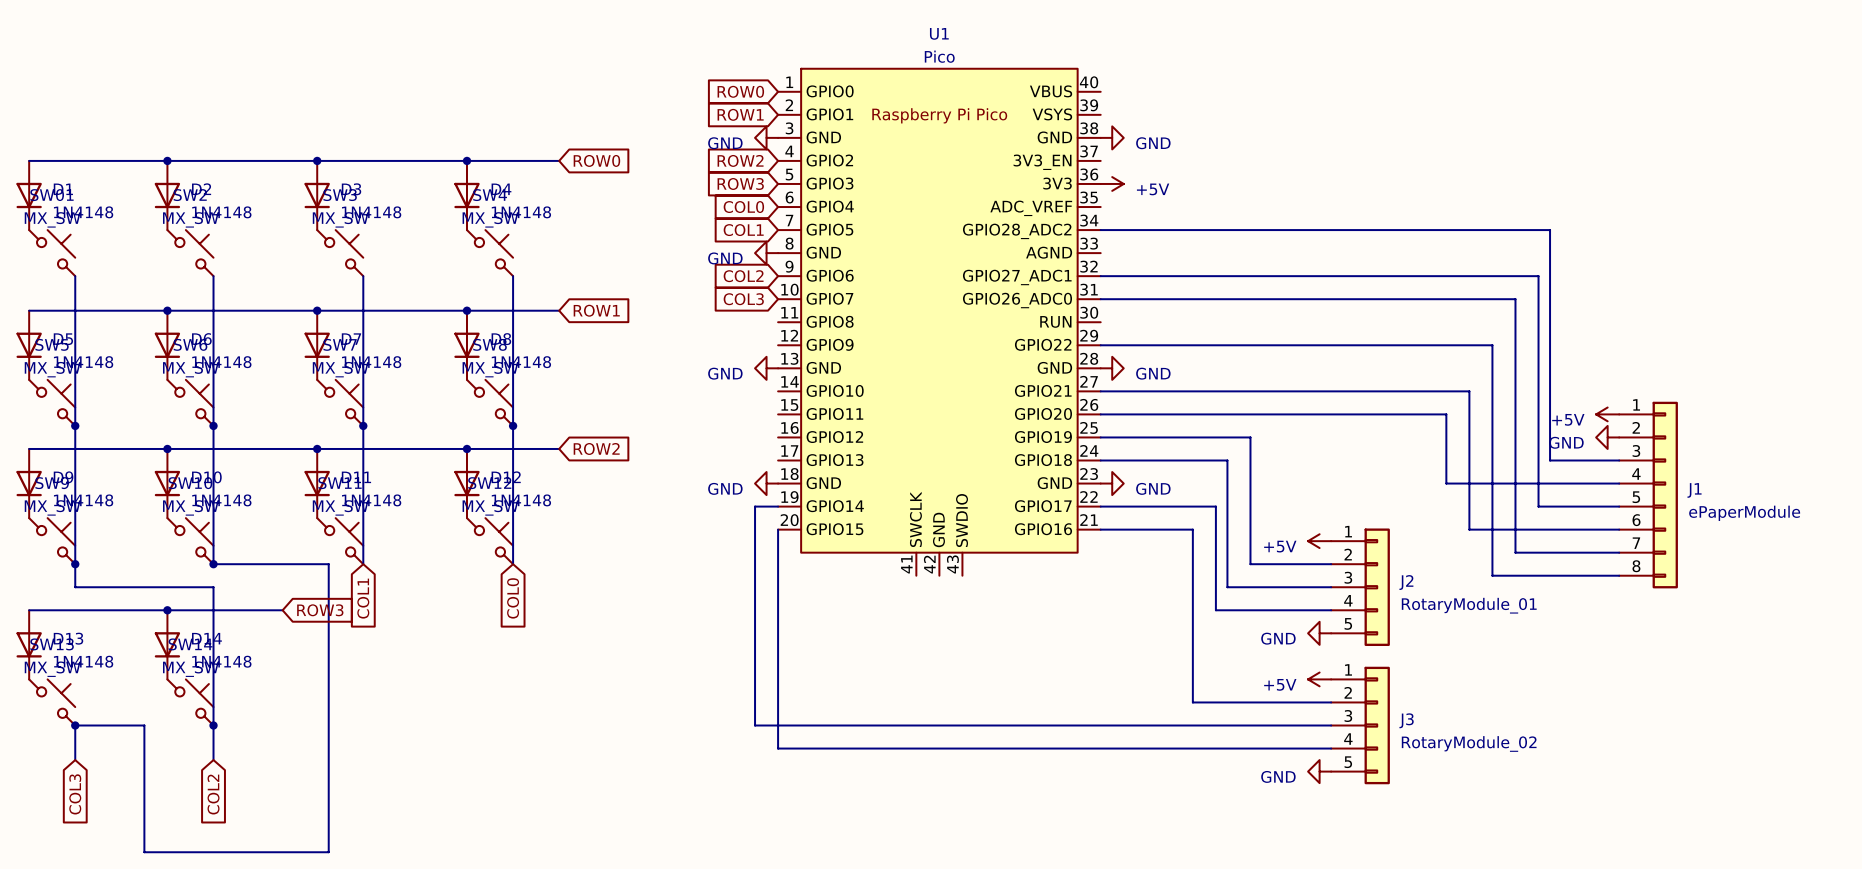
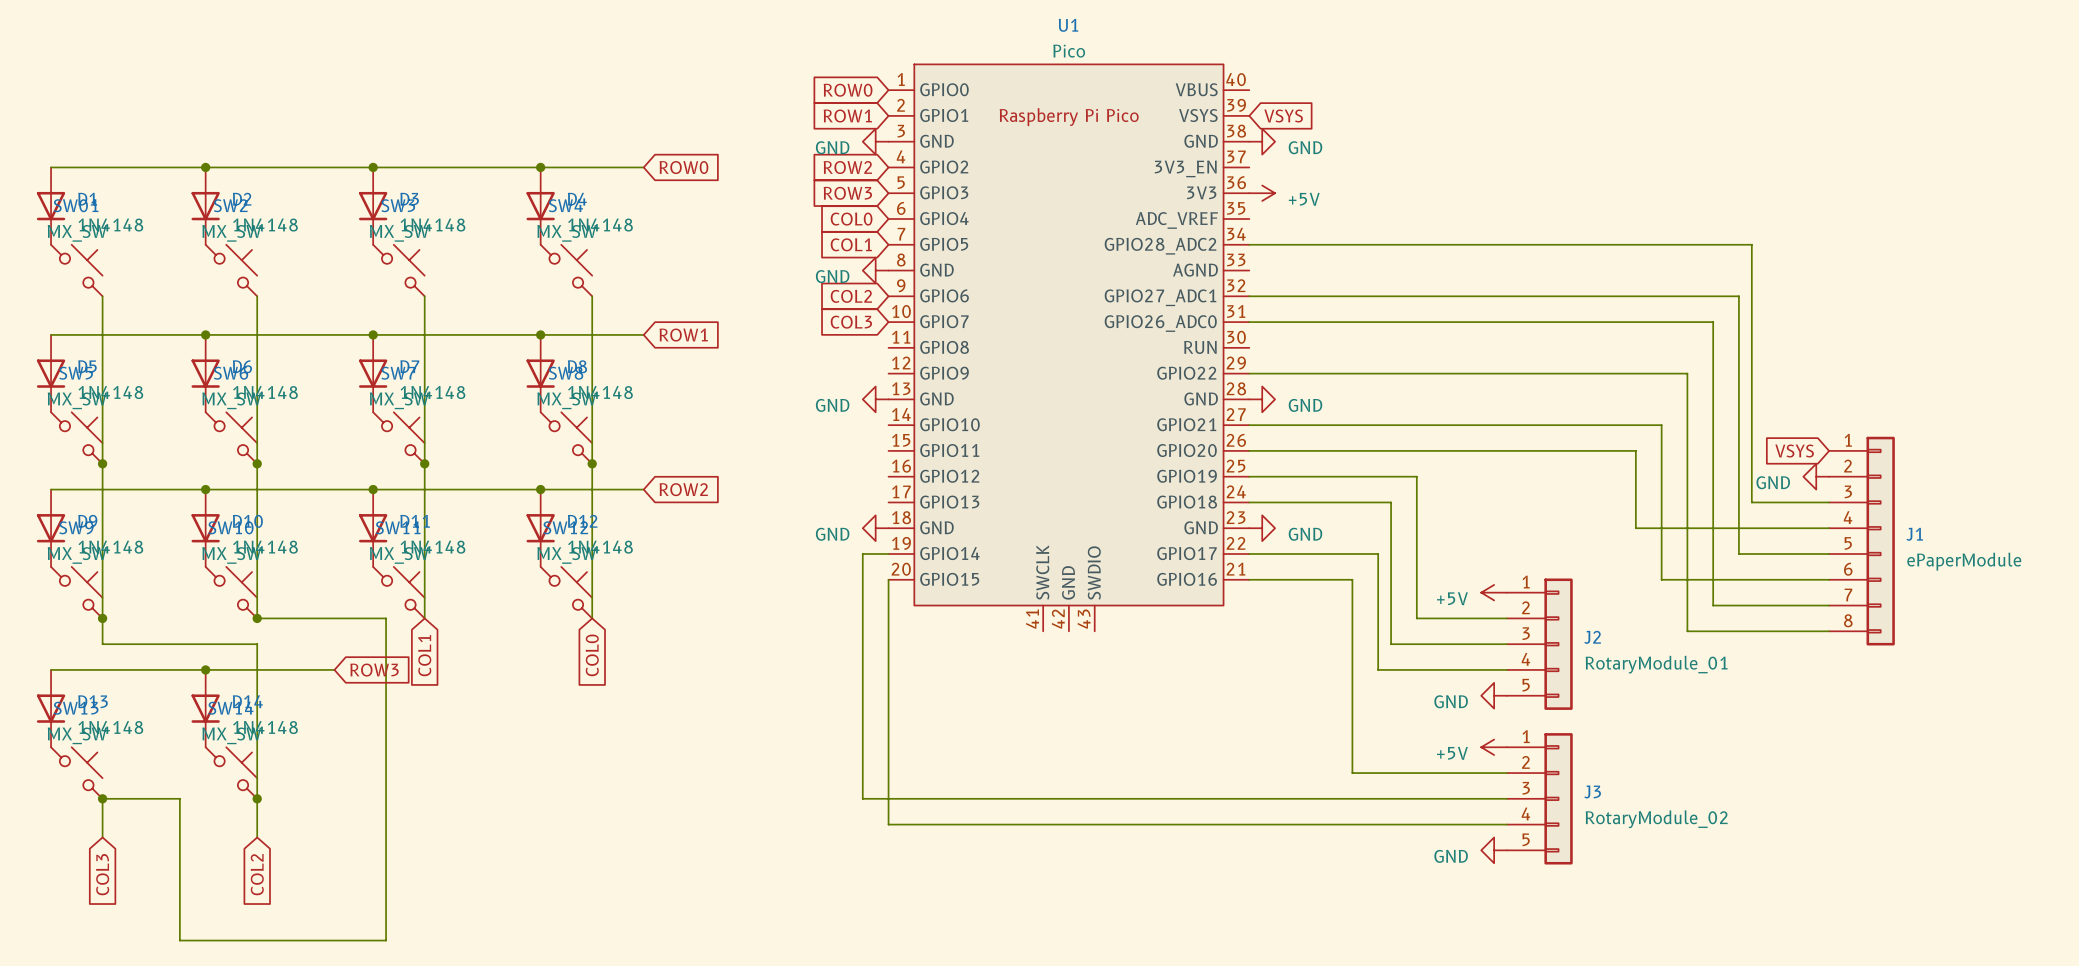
global label: none -> VSYS (1283, 116)
global label: none -> VSYS (1794, 451)
power symbol: +5V (1607, 414) -> none

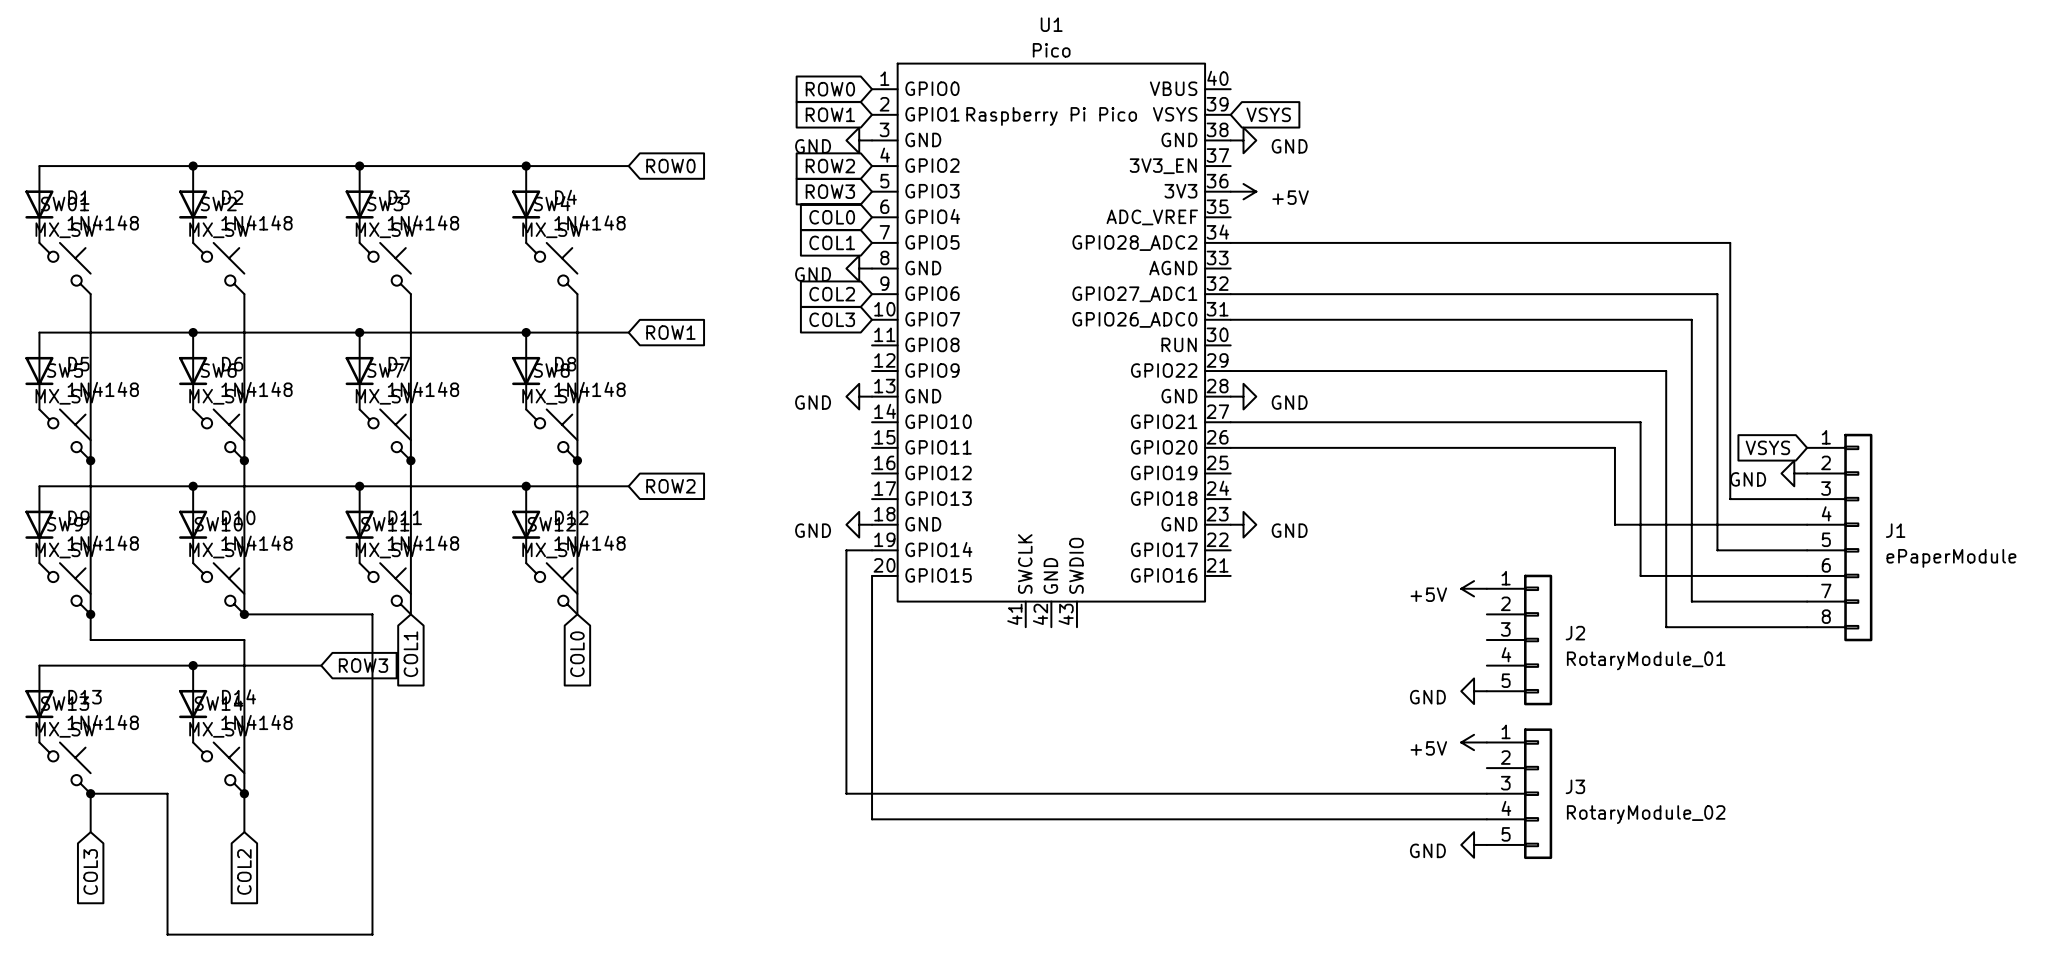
wire: (1249, 476) (1416, 476) (1416, 618) (1507, 618) -> none
wire: (1249, 502) (1391, 502) (1391, 644) (1507, 644) -> none
wire: (1249, 554) (1378, 554) (1378, 669) (1507, 669) -> none
wire: (1249, 579) (1352, 579) (1352, 773) (1507, 773) -> none

